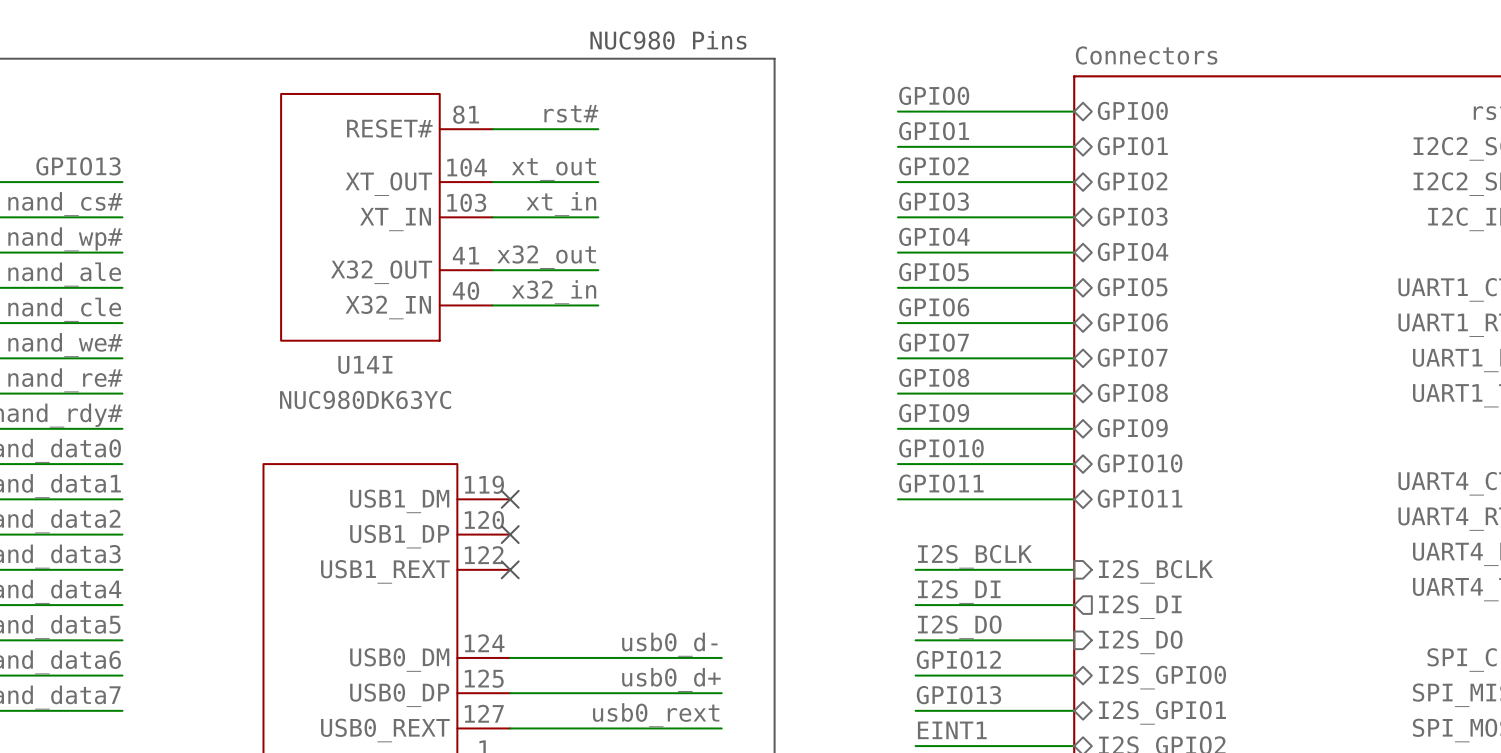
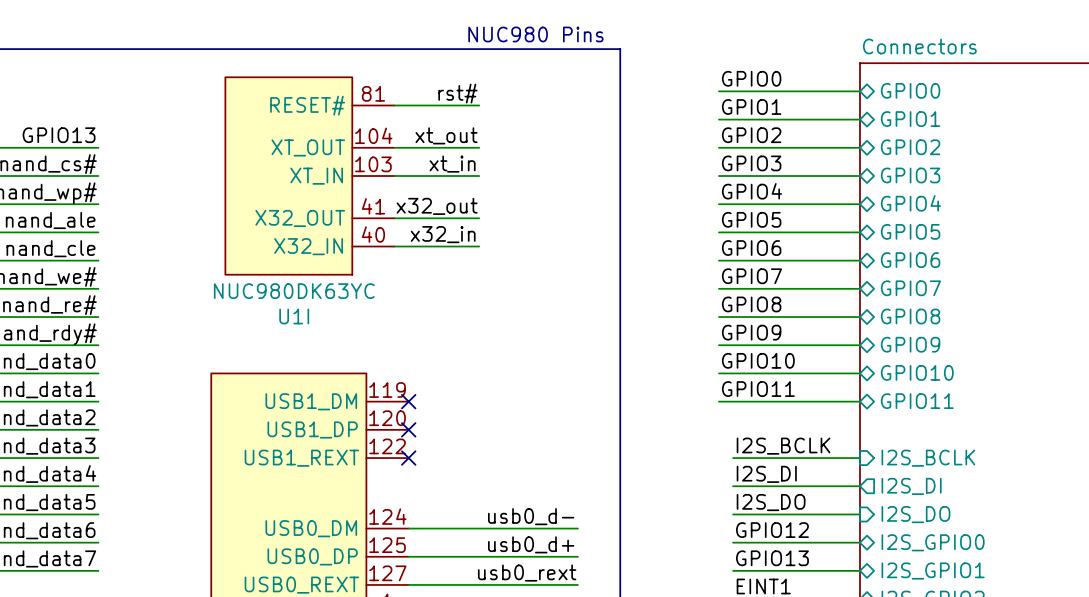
U14I name: U14I (365, 364) -> U1I (294, 316)
U14I value position: NUC980DK63YC (365, 399) -> NUC980DK63YC (294, 291)

